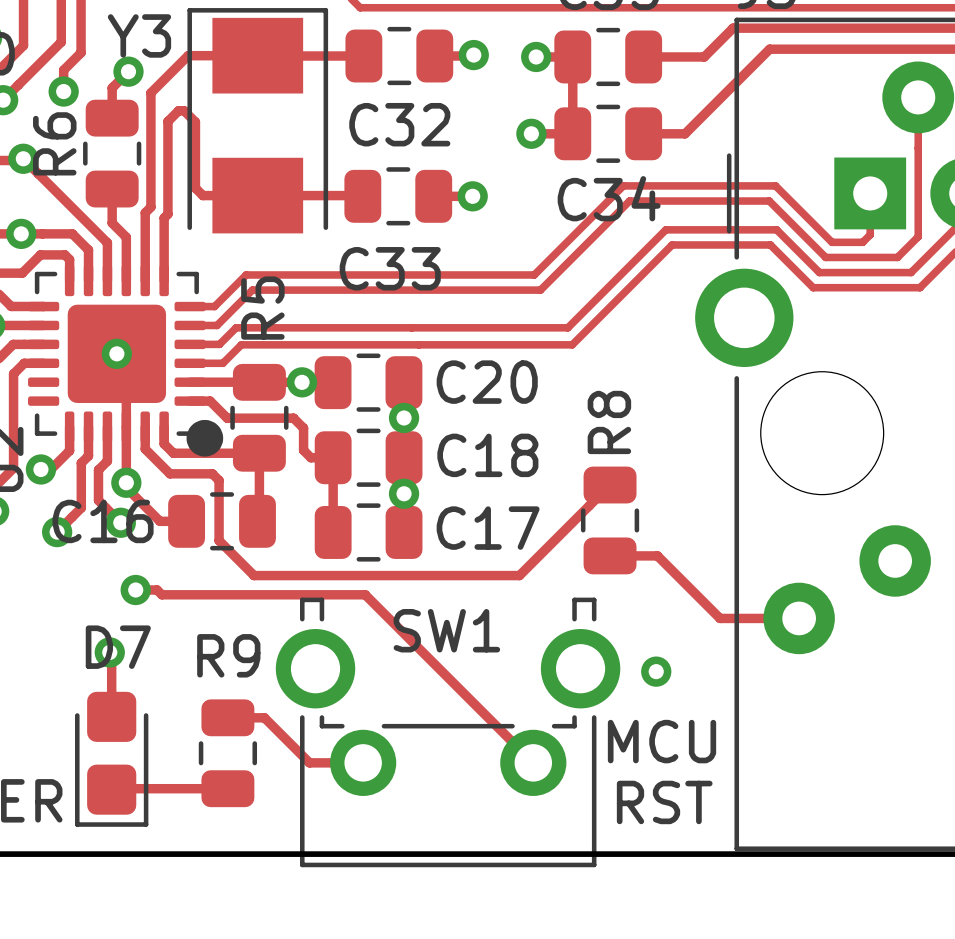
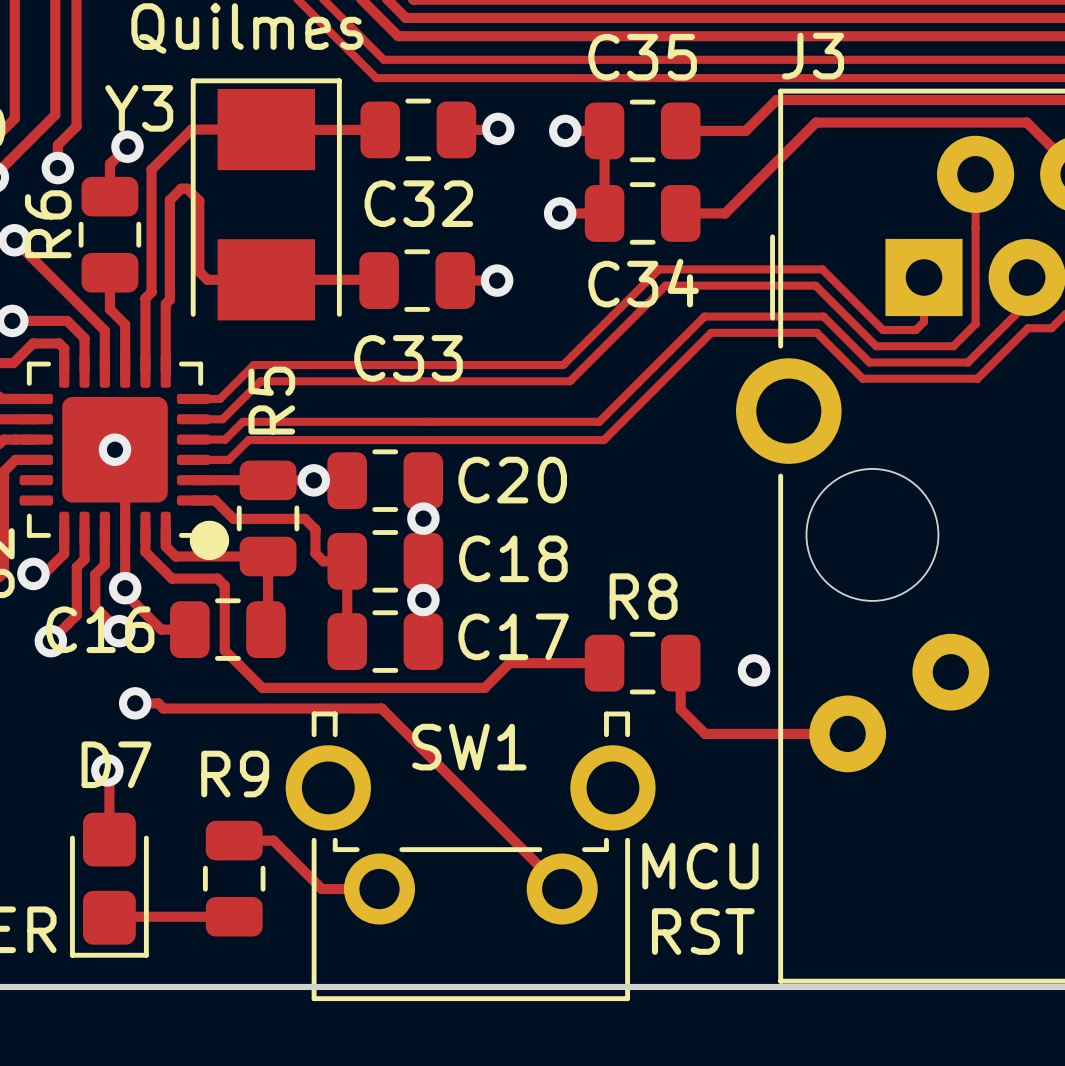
track: (610, 485) (519, 575) (461, 575) -> (604, 663) (509, 663) (484, 687)
R8 rotation: 0° (610, 520) -> 90° clockwise (642, 663)
track: (610, 555) (657, 555) (720, 618) -> (680, 663) (680, 709) (705, 733) (762, 733)
via position: (656, 671) -> (754, 670)

